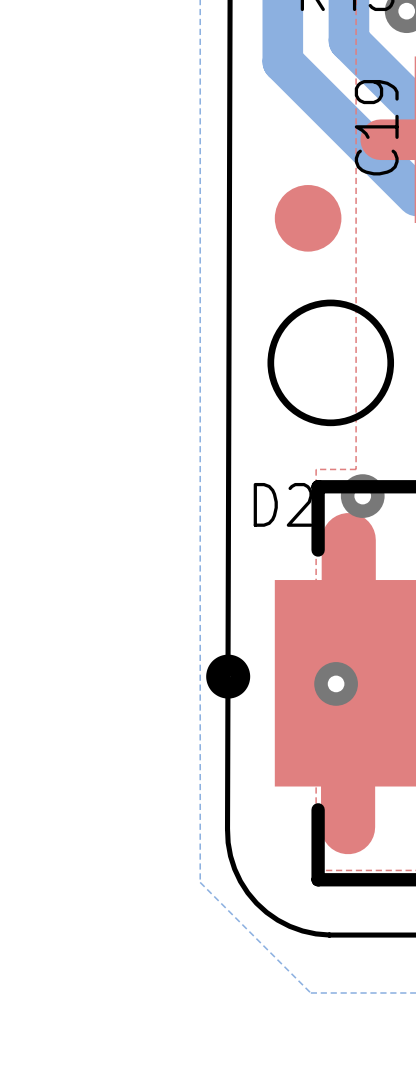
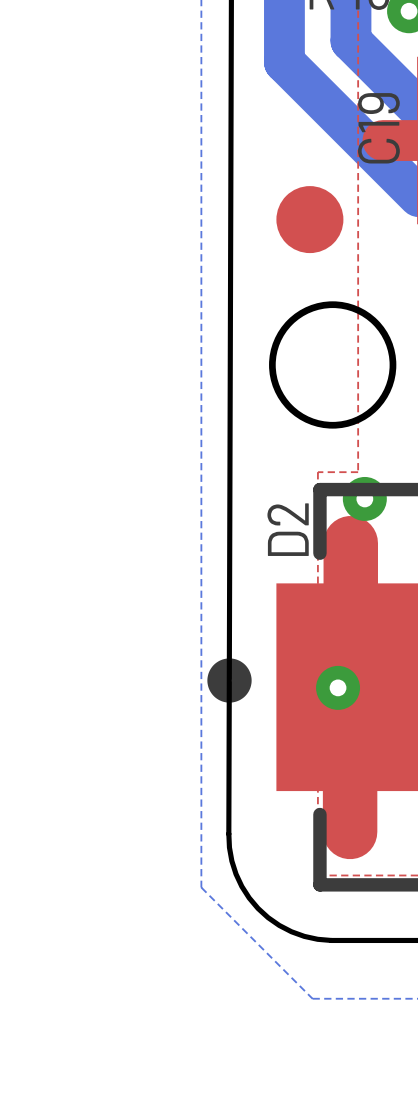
D2 name rotation: 0° (283, 504) -> 90° counterclockwise (288, 529)

